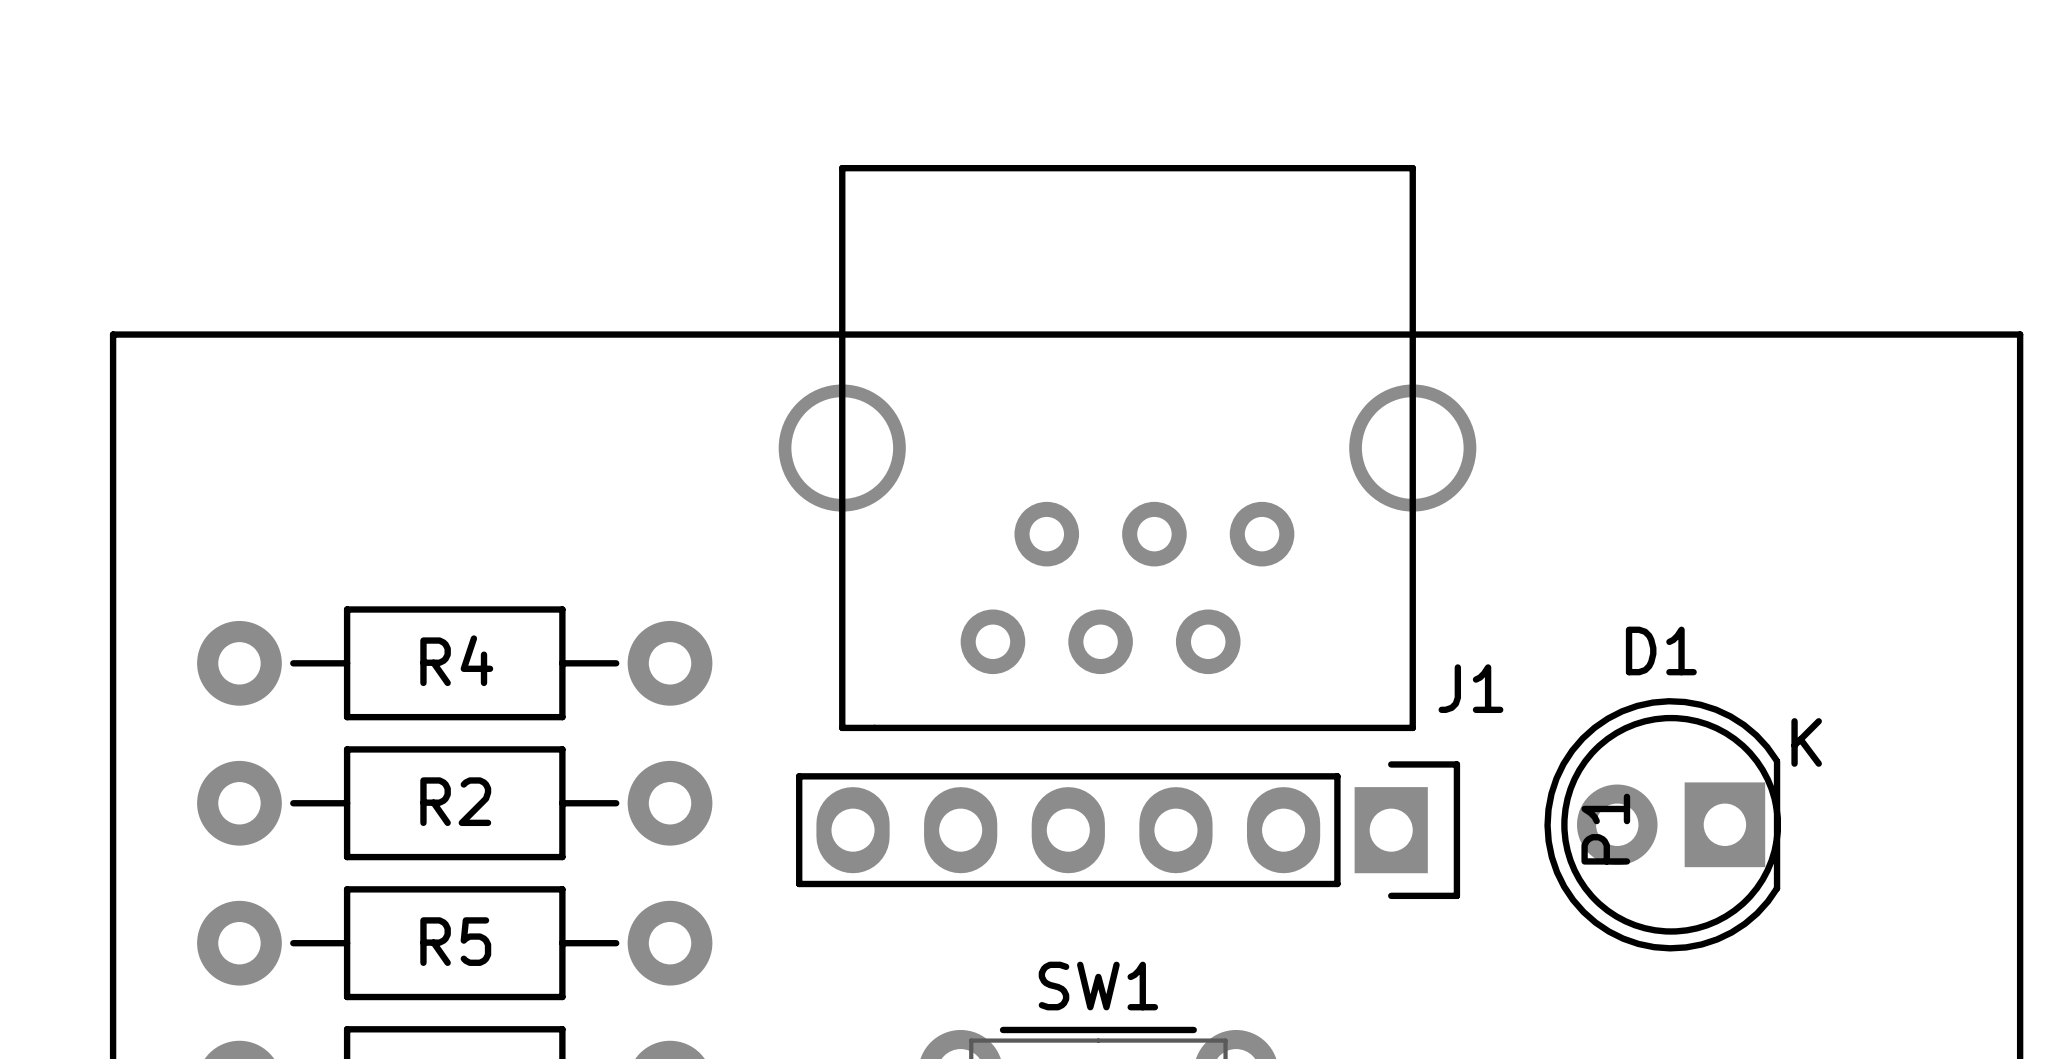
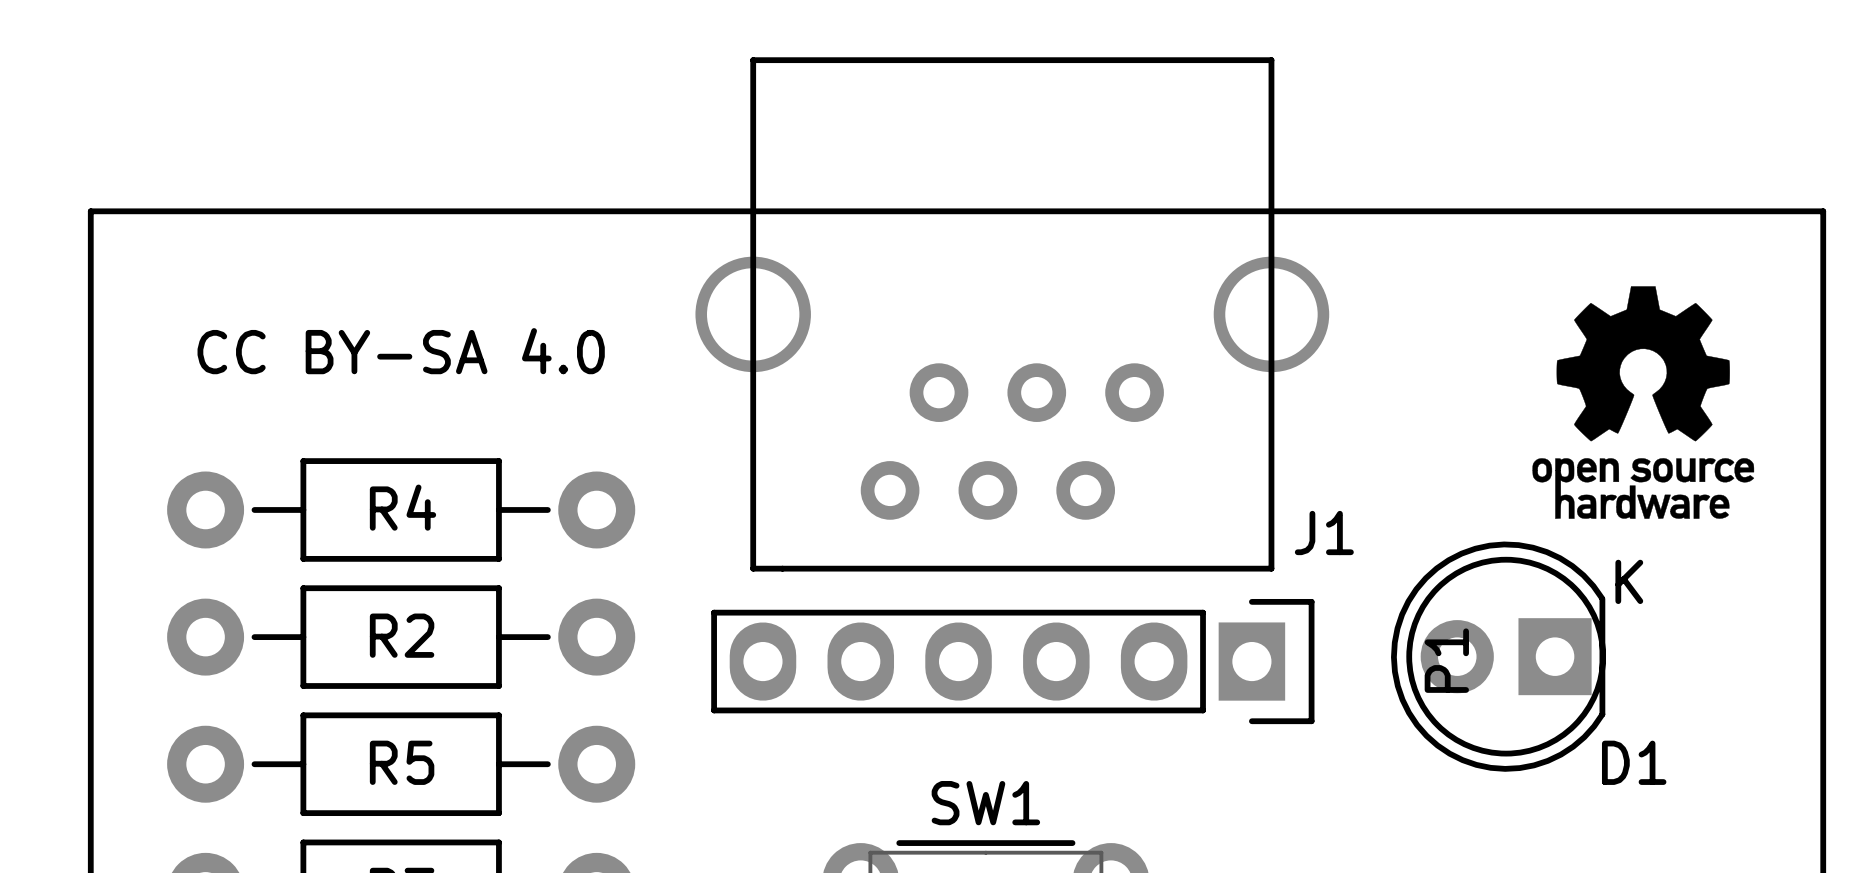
drawing: none -> [1532, 286, 1755, 519]
text: none -> CC BY-SA 4.0 (401, 351)
D1 name position: D1 (1661, 650) -> D1 (1634, 762)

